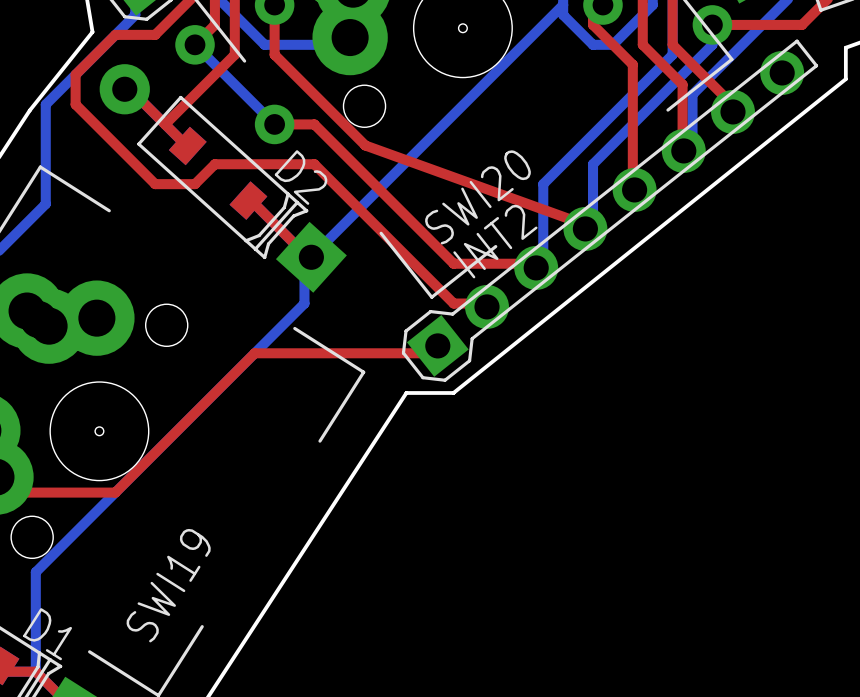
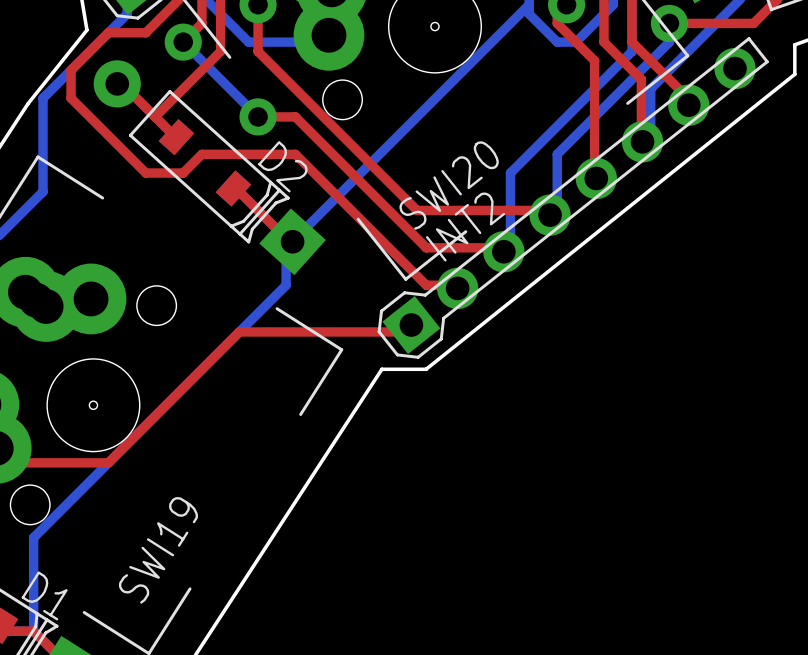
top track: (365, 145) (583, 223) -> (343, 136) (416, 210) (547, 210)

